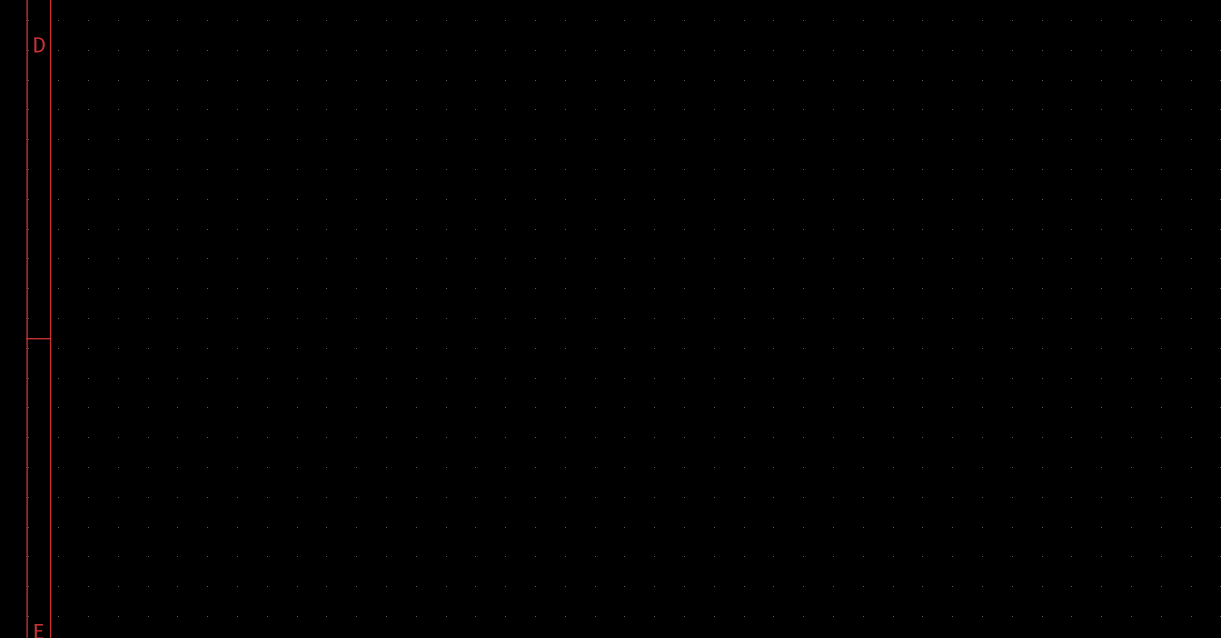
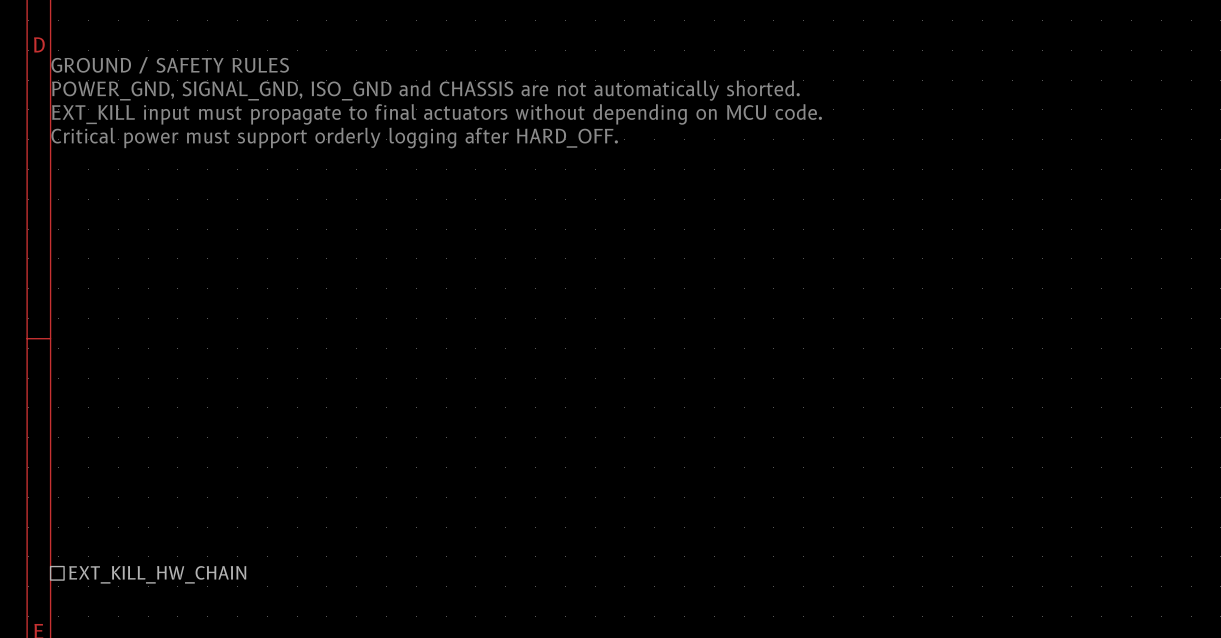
text: none -> GROUND / SAFETY RULES (170, 65)
text: none -> POWER_GND, SIGNAL_GND, ISO_GND and CHASSIS are not automatically shorted. (425, 90)
text: none -> EXT_KILL input must propagate to final actuators without depending on MCU code. (437, 114)
text: none -> Critical power must support orderly logging after HARD_OFF. (334, 138)
hierarchical label: none -> EXT_KILL_HW_CHAIN (157, 574)

